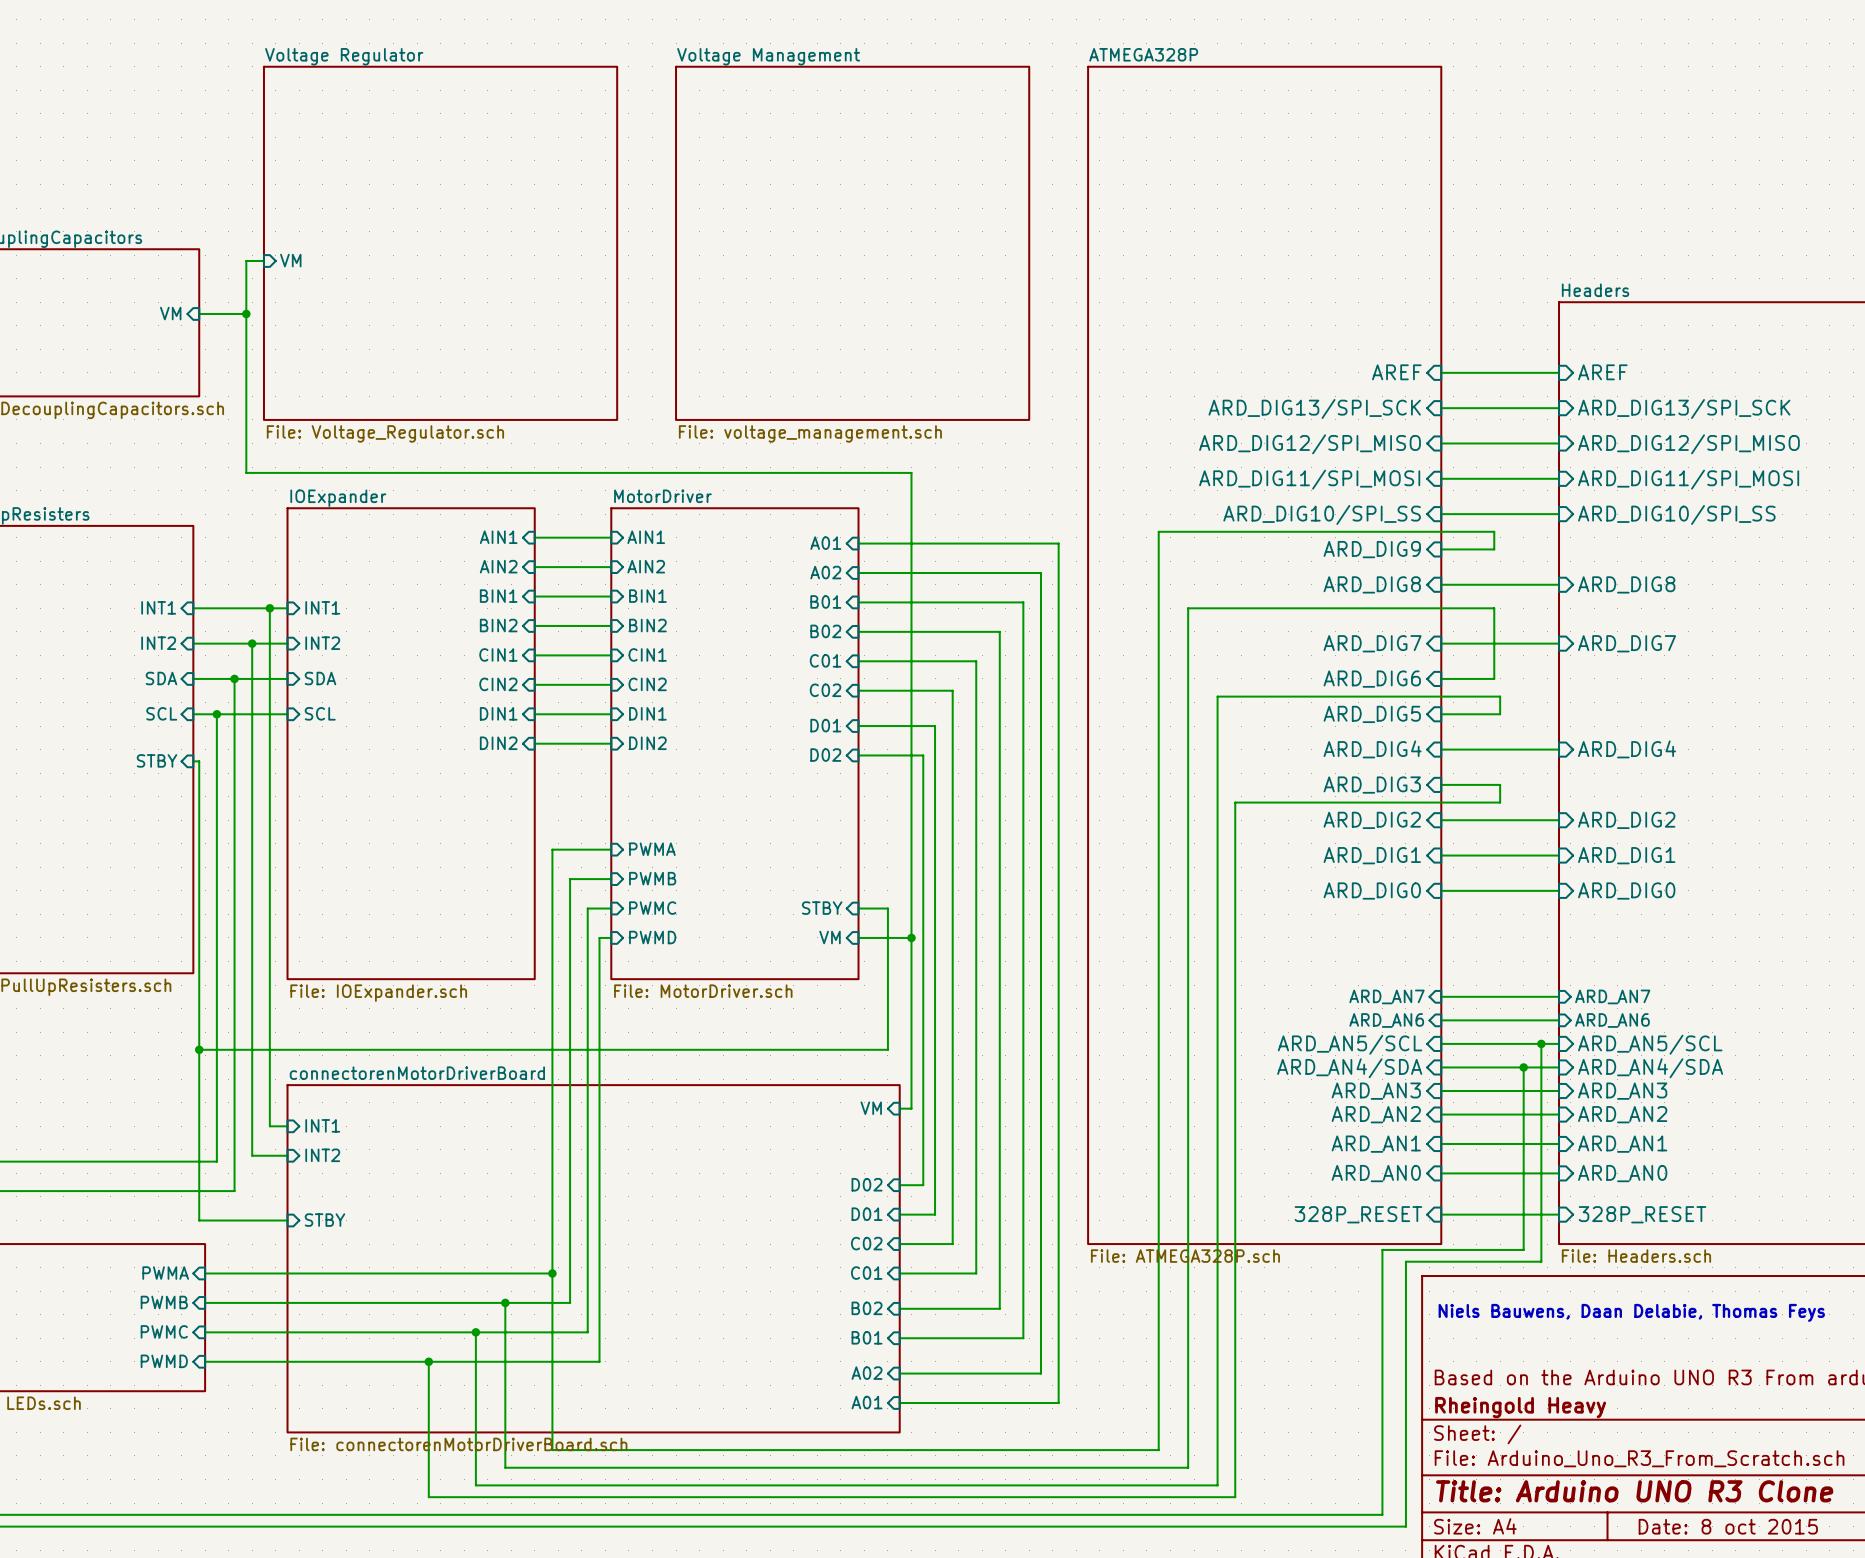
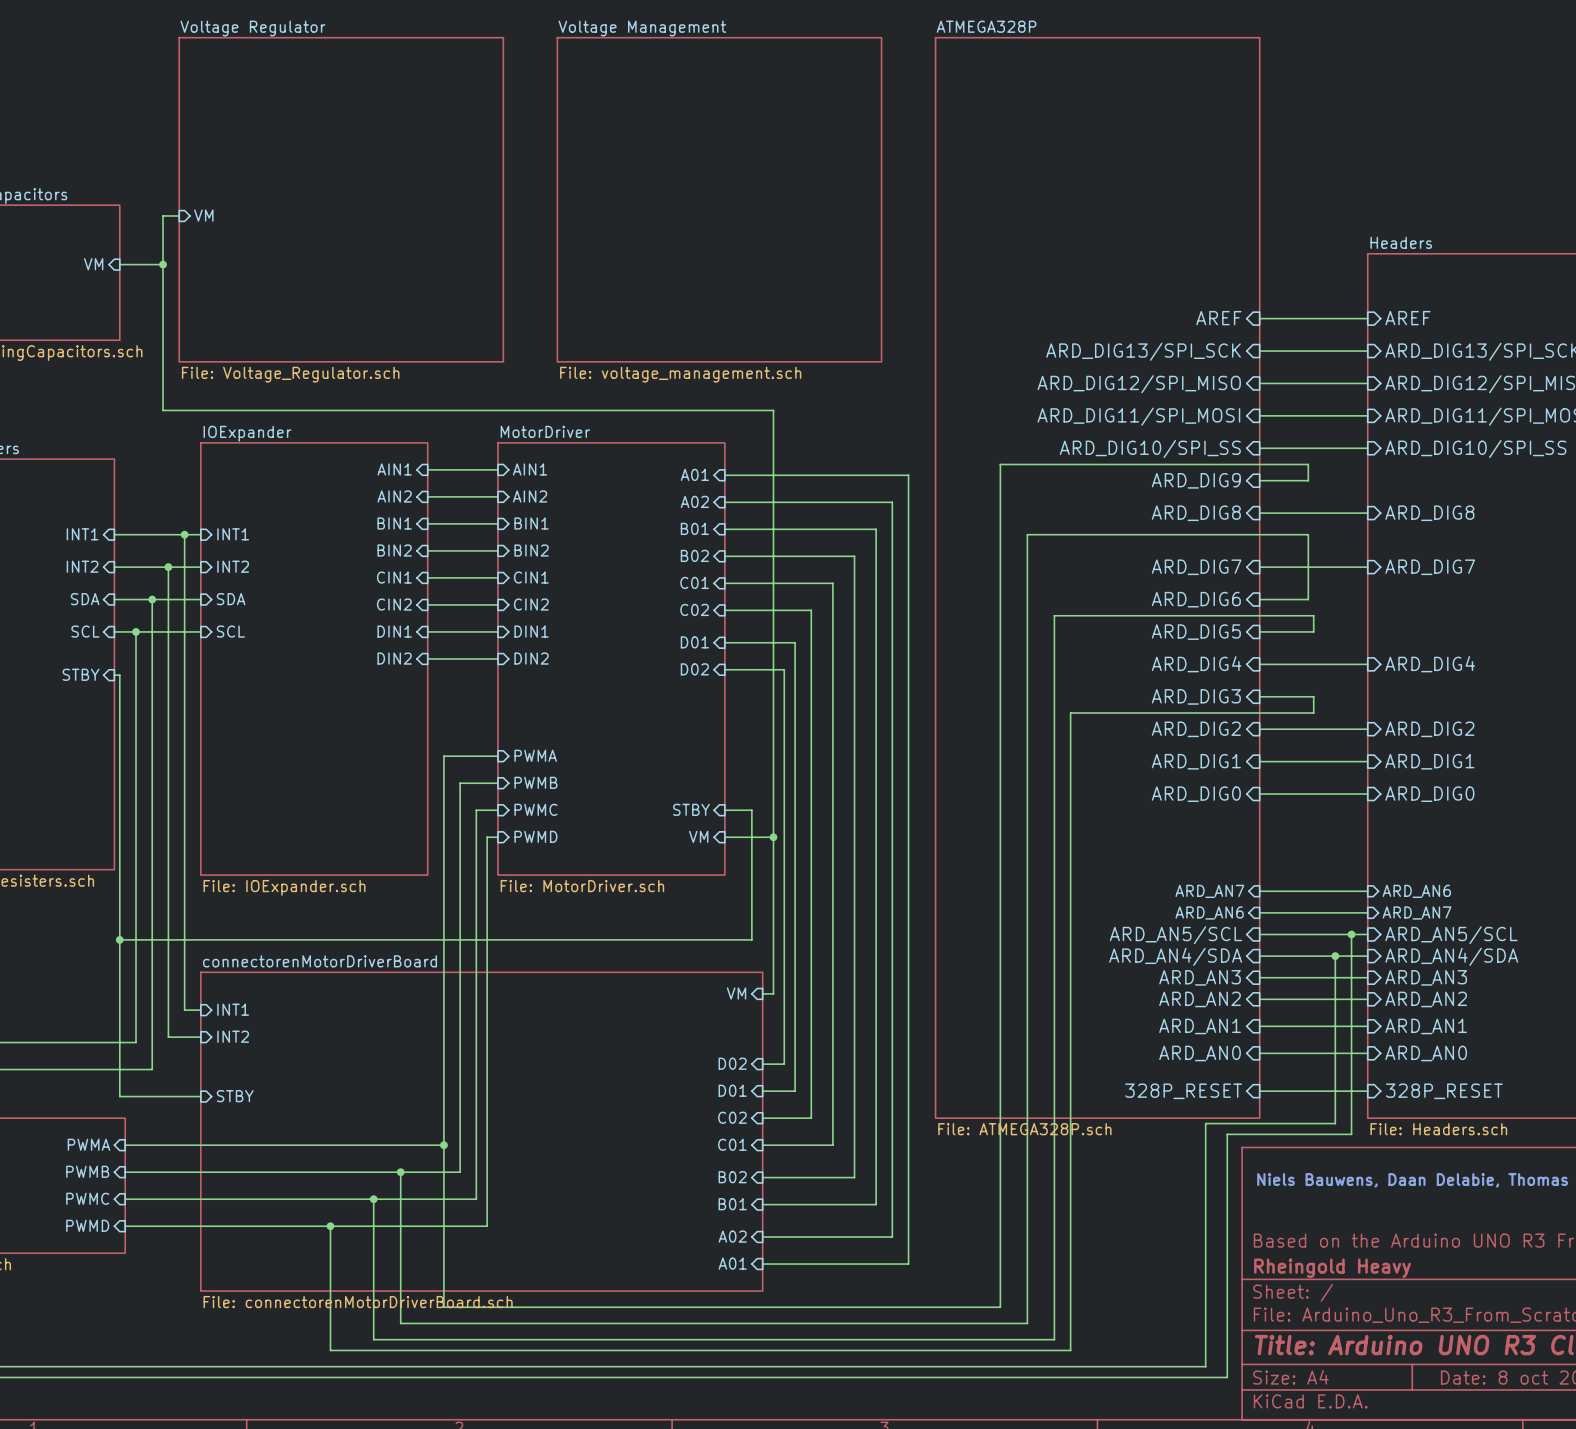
sheet pin: ARD_AN7 (1612, 996) -> ARD_AN6 (1416, 891)
sheet pin: ARD_AN6 (1612, 1020) -> ARD_AN7 (1417, 912)

